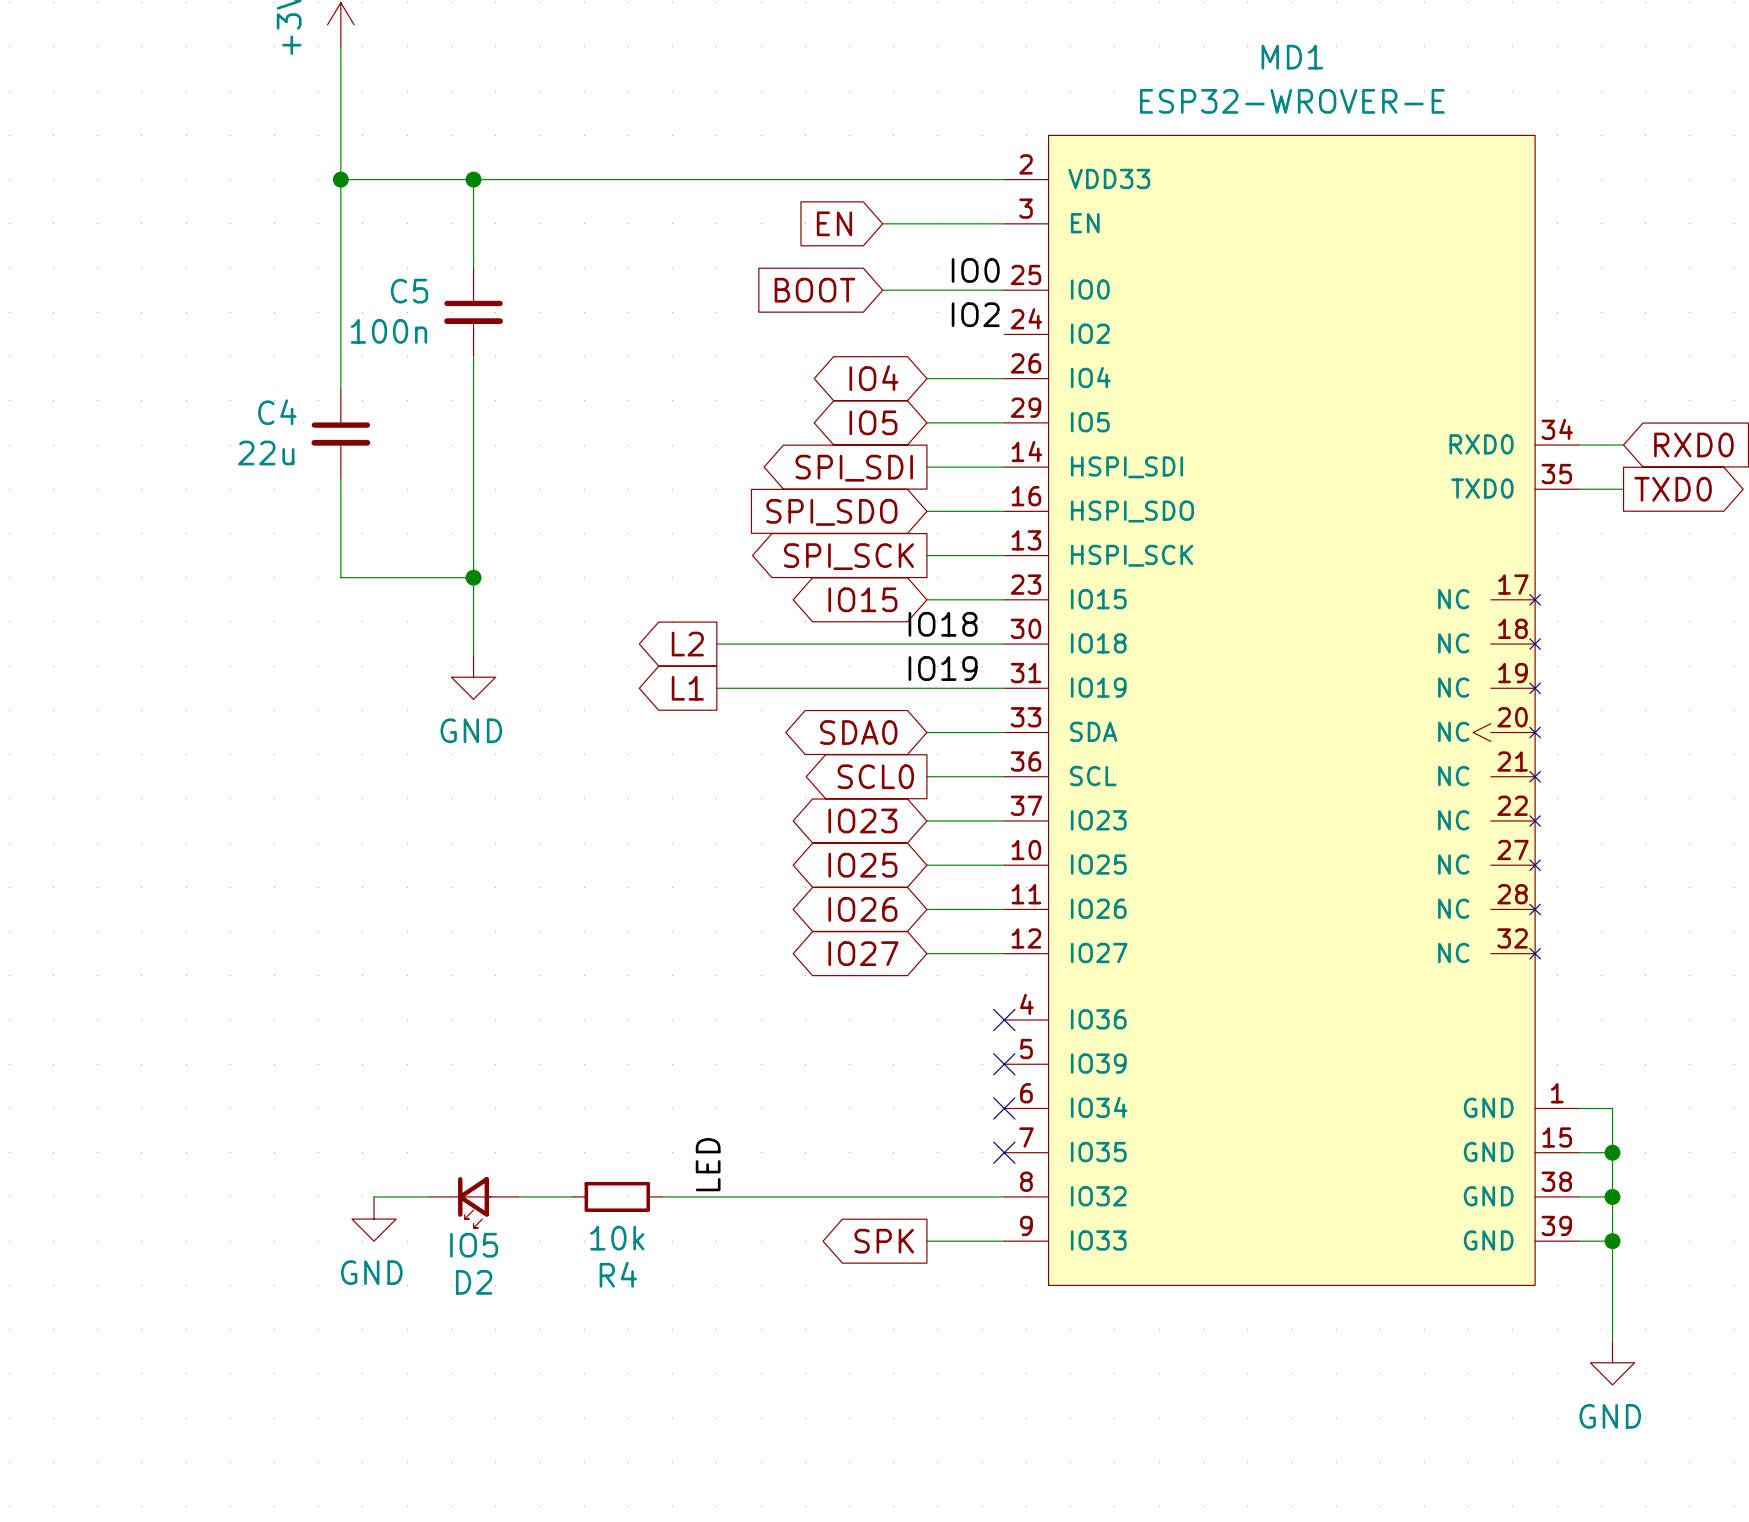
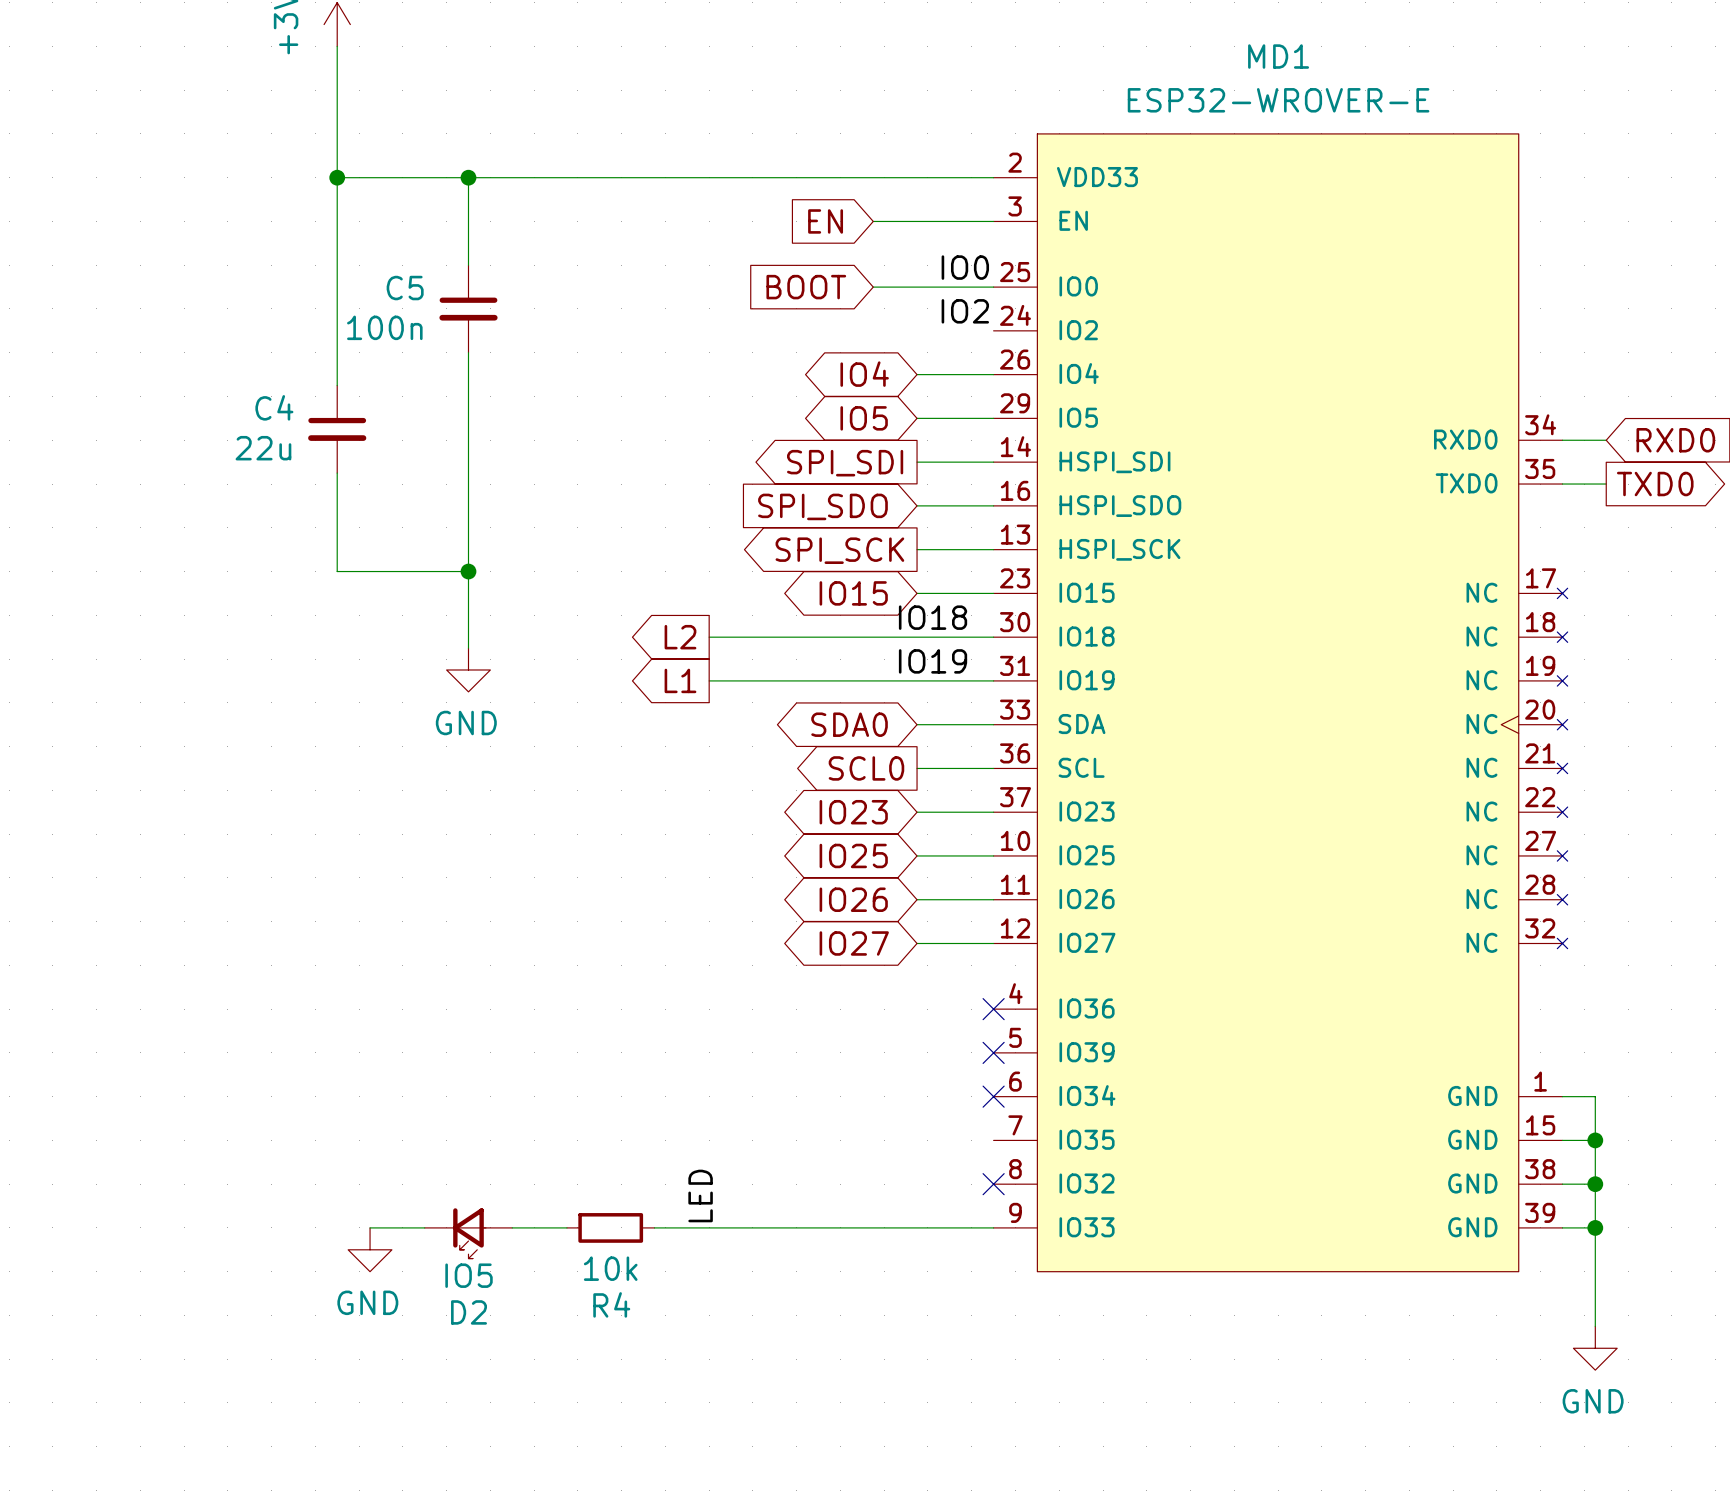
MD1 symbol: [1004, 135, 1580, 1286] -> [993, 133, 1568, 1272]
no-connect mark position: (1004, 1152) -> (993, 1184)
label position: LED (708, 1164) -> LED (700, 1195)
wire: (374, 1196) (429, 1196) -> (370, 1227) (424, 1227)
wire: (517, 1196) (573, 1196) -> (512, 1227) (566, 1227)
R4 position: (617, 1196) -> (610, 1227)
wire: (661, 1196) (1004, 1196) -> none
D2 position: (473, 1202) -> (468, 1233)
power symbol position: GND (374, 1219) -> GND (370, 1249)
wire: none -> (654, 1227) (917, 1227)
global label: SPK (884, 1241) -> none

